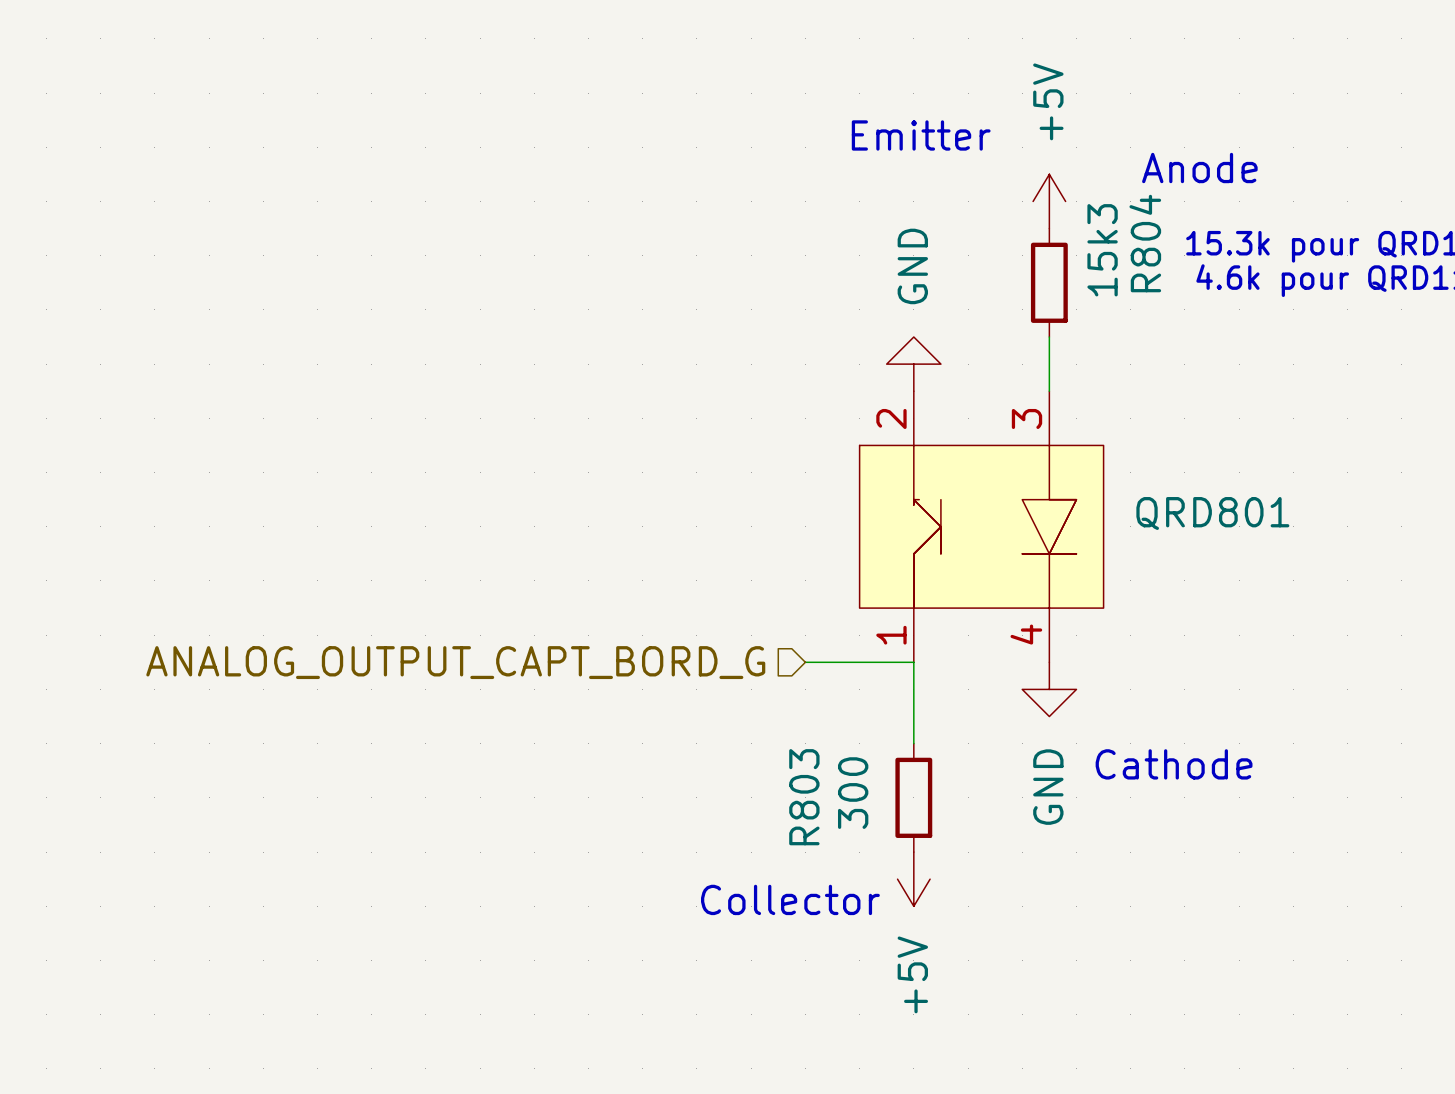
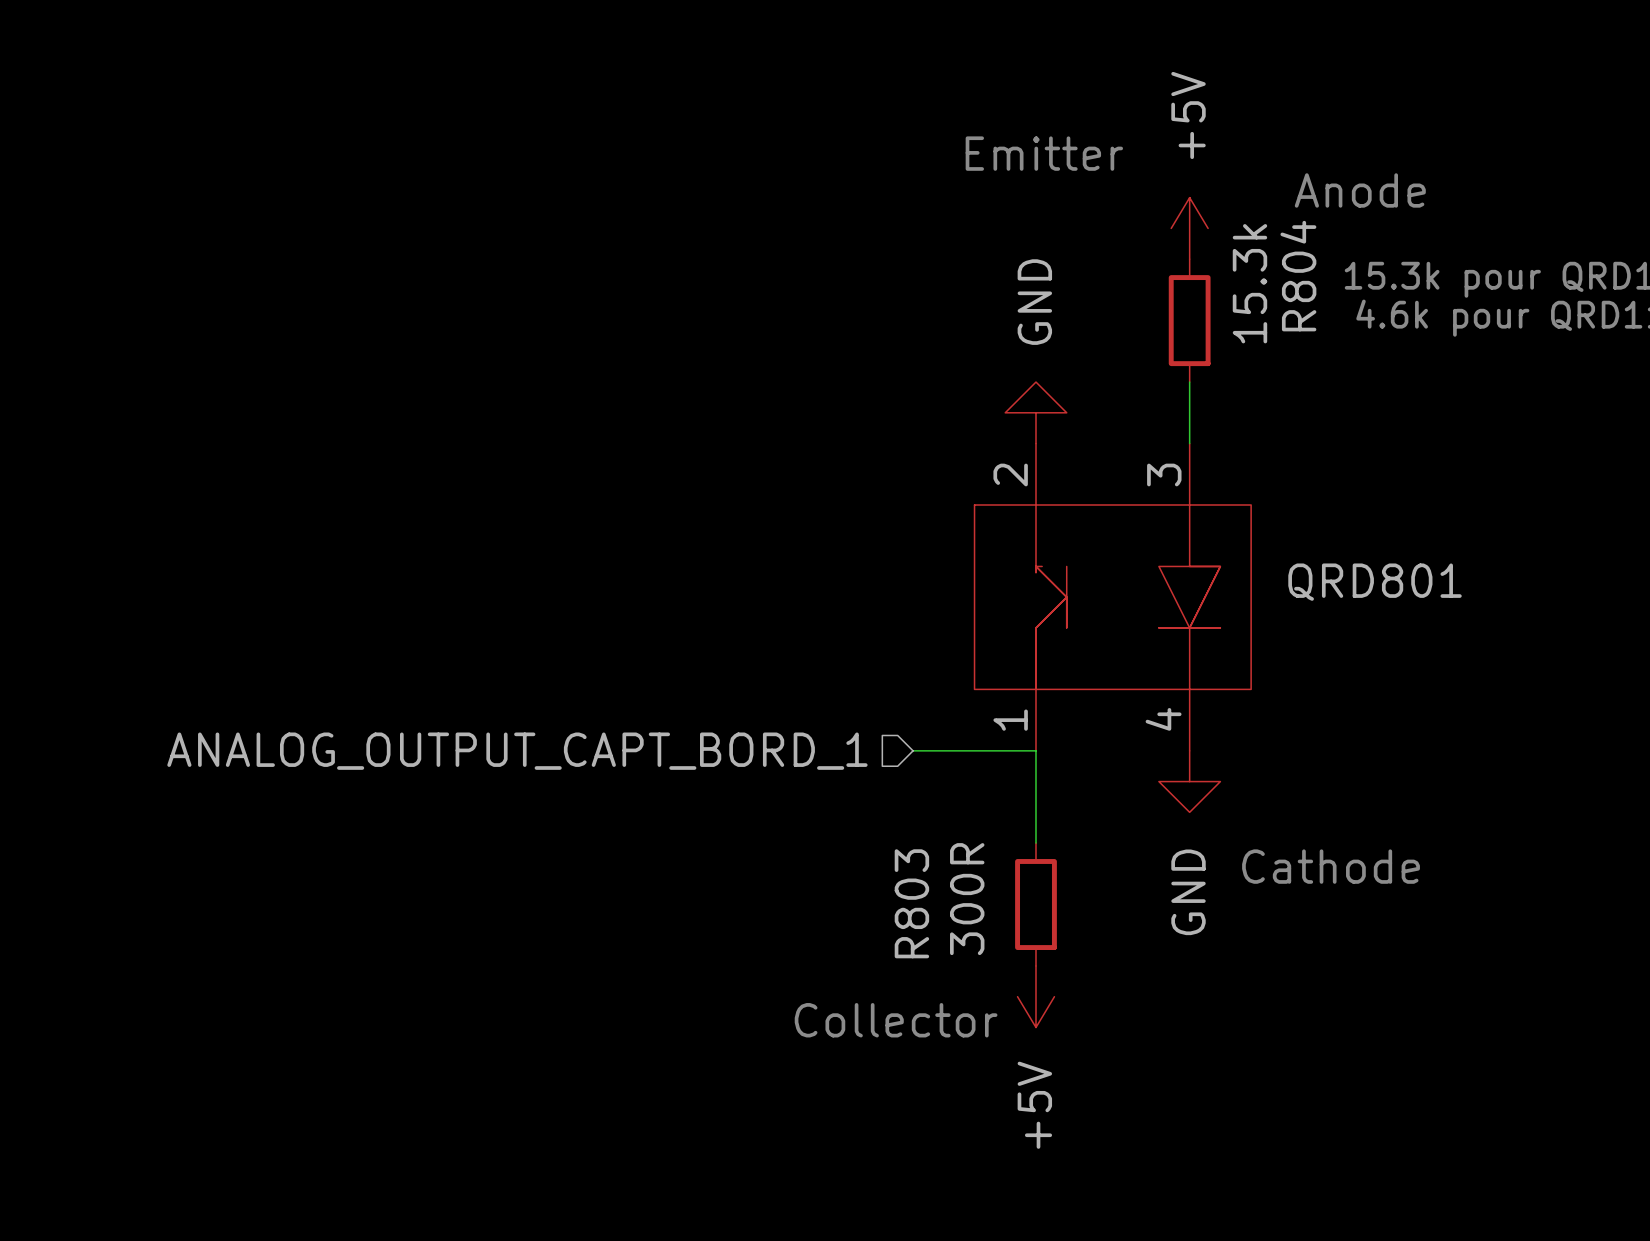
R804 value: 15k3 (1102, 250) -> 15.3k (1249, 283)
hierarchical label: ANALOG_OUTPUT_CAPT_BORD_G (455, 662) -> ANALOG_OUTPUT_CAPT_BORD_1 (517, 751)
R803 value: 300 (853, 793) -> 300R (967, 899)

